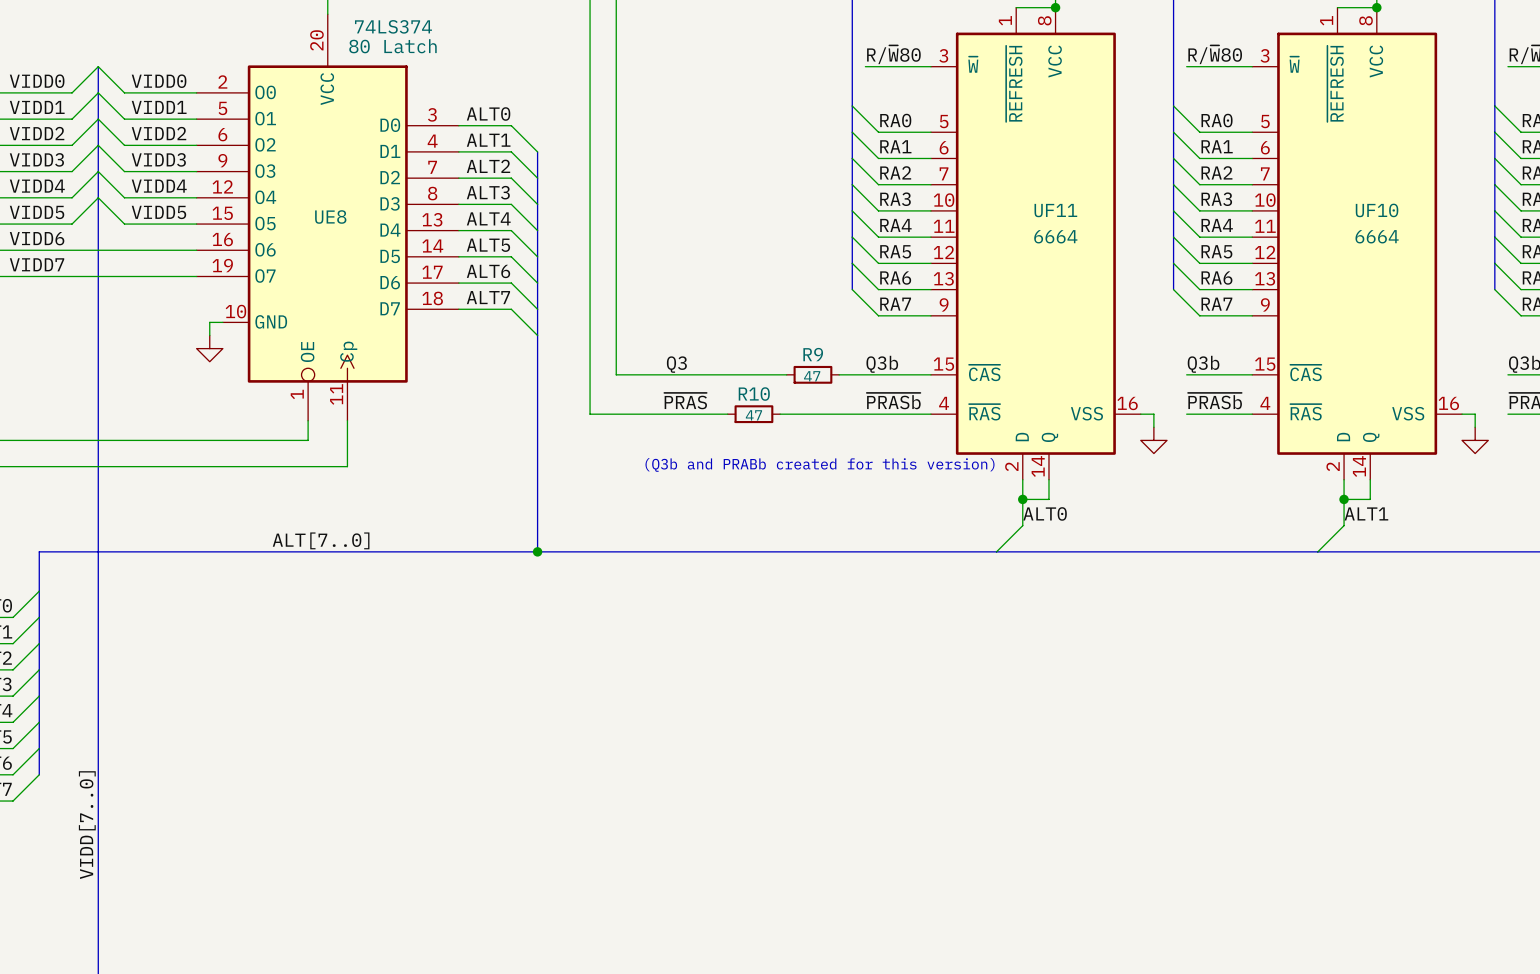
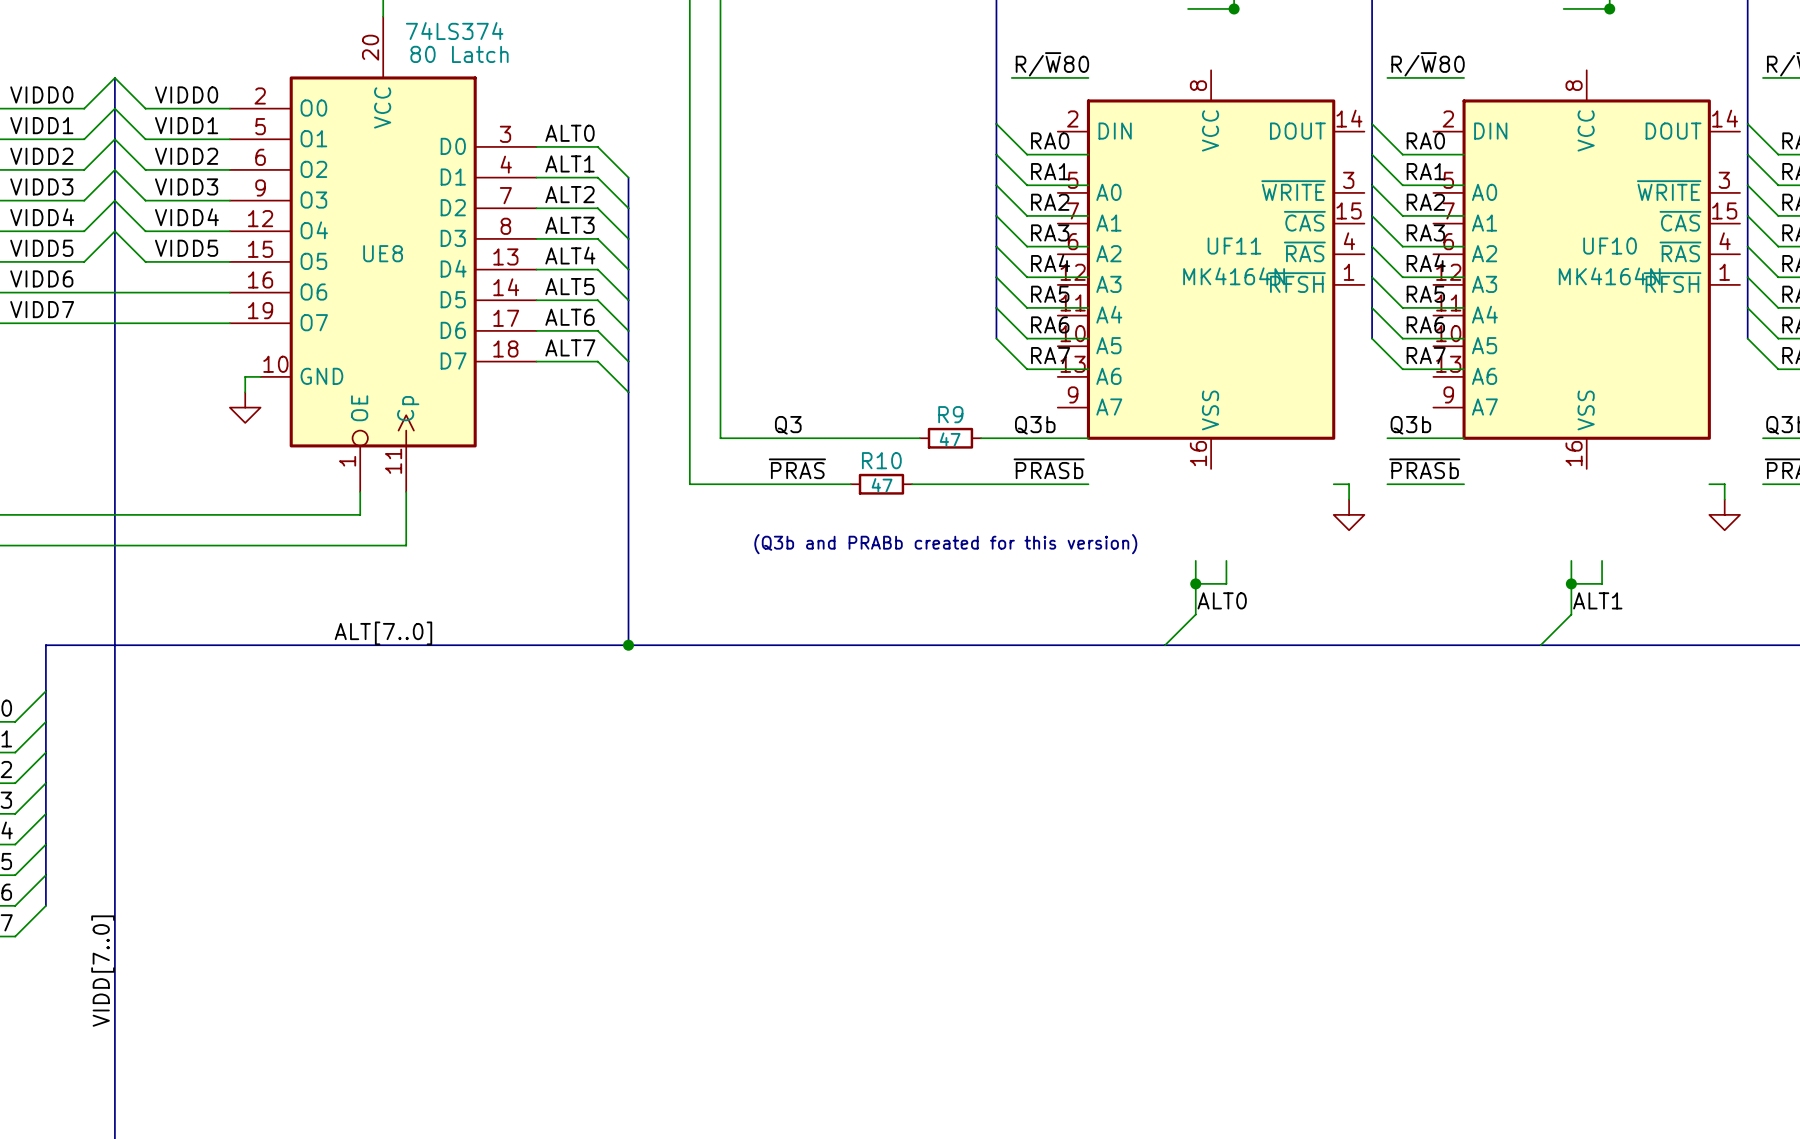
UF11 symbol: [930, 7, 1141, 480] -> [1057, 70, 1365, 469]
UF10 symbol: [1252, 7, 1463, 480] -> [1433, 70, 1741, 469]
UF11 value: 6664 (1055, 236) -> MK4164N (1234, 276)
UF10 value: 6664 (1377, 236) -> MK4164N (1609, 276)

